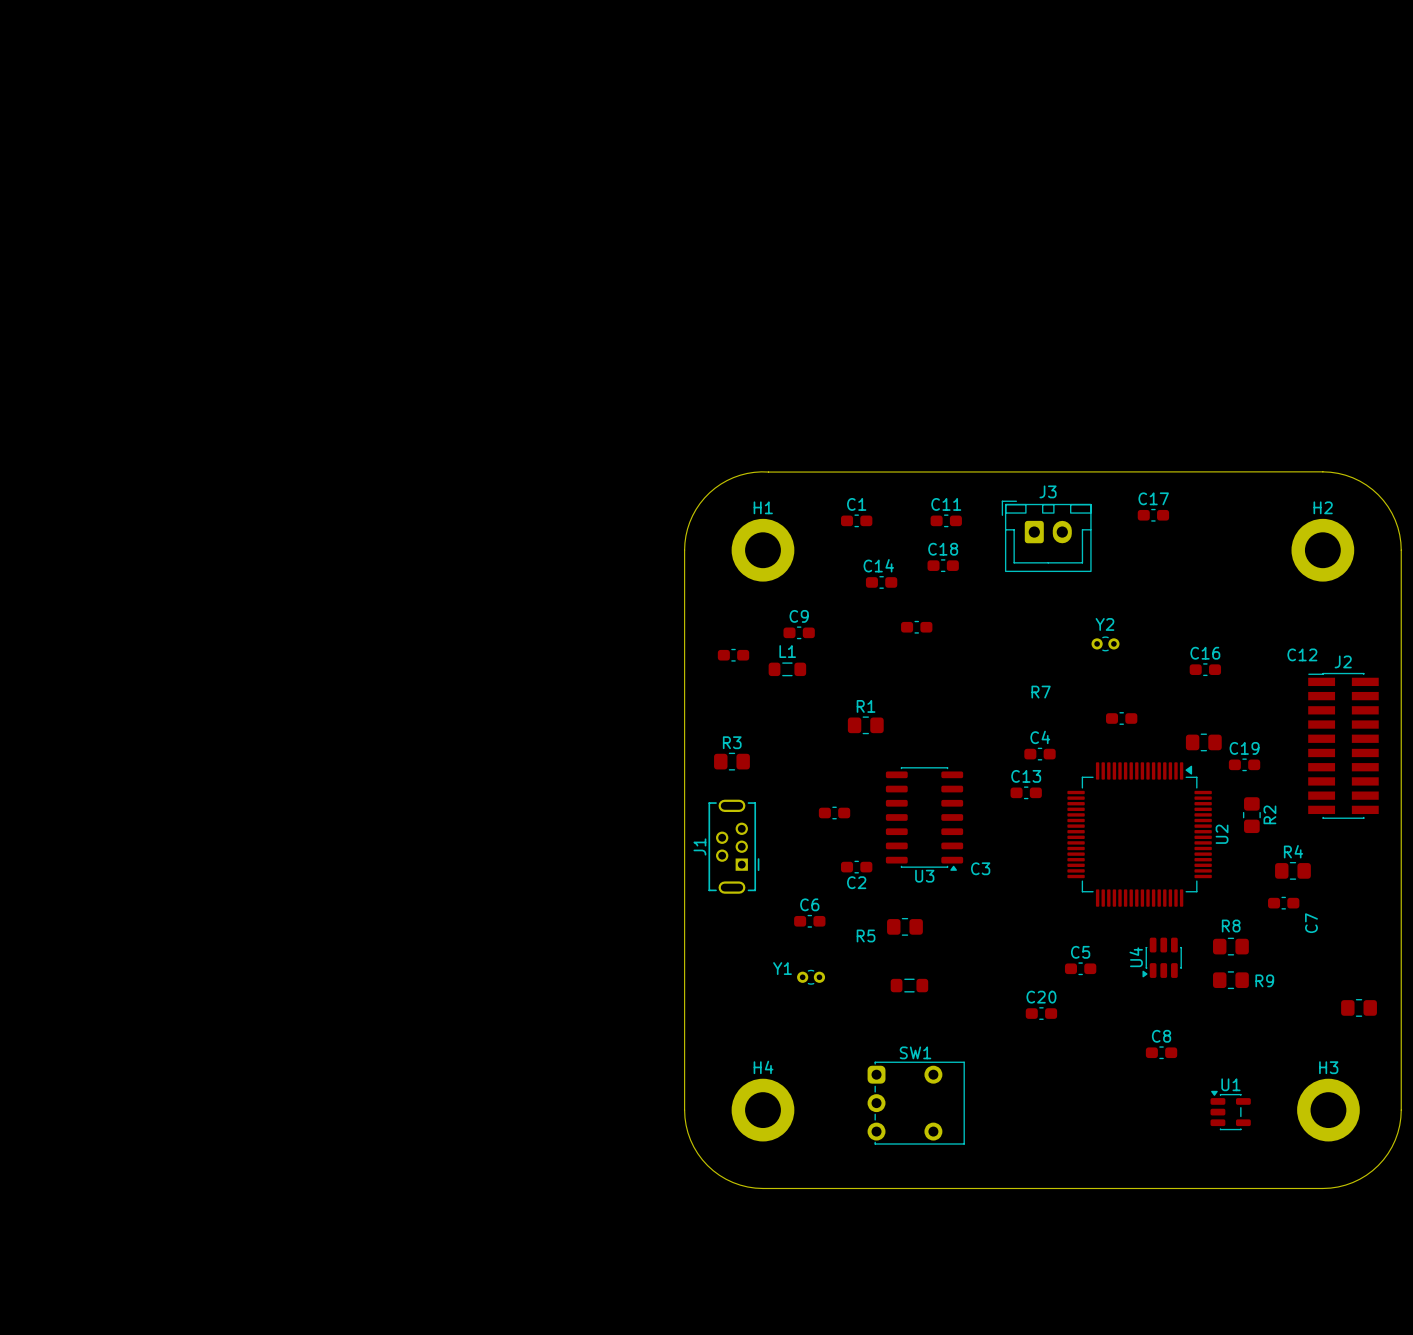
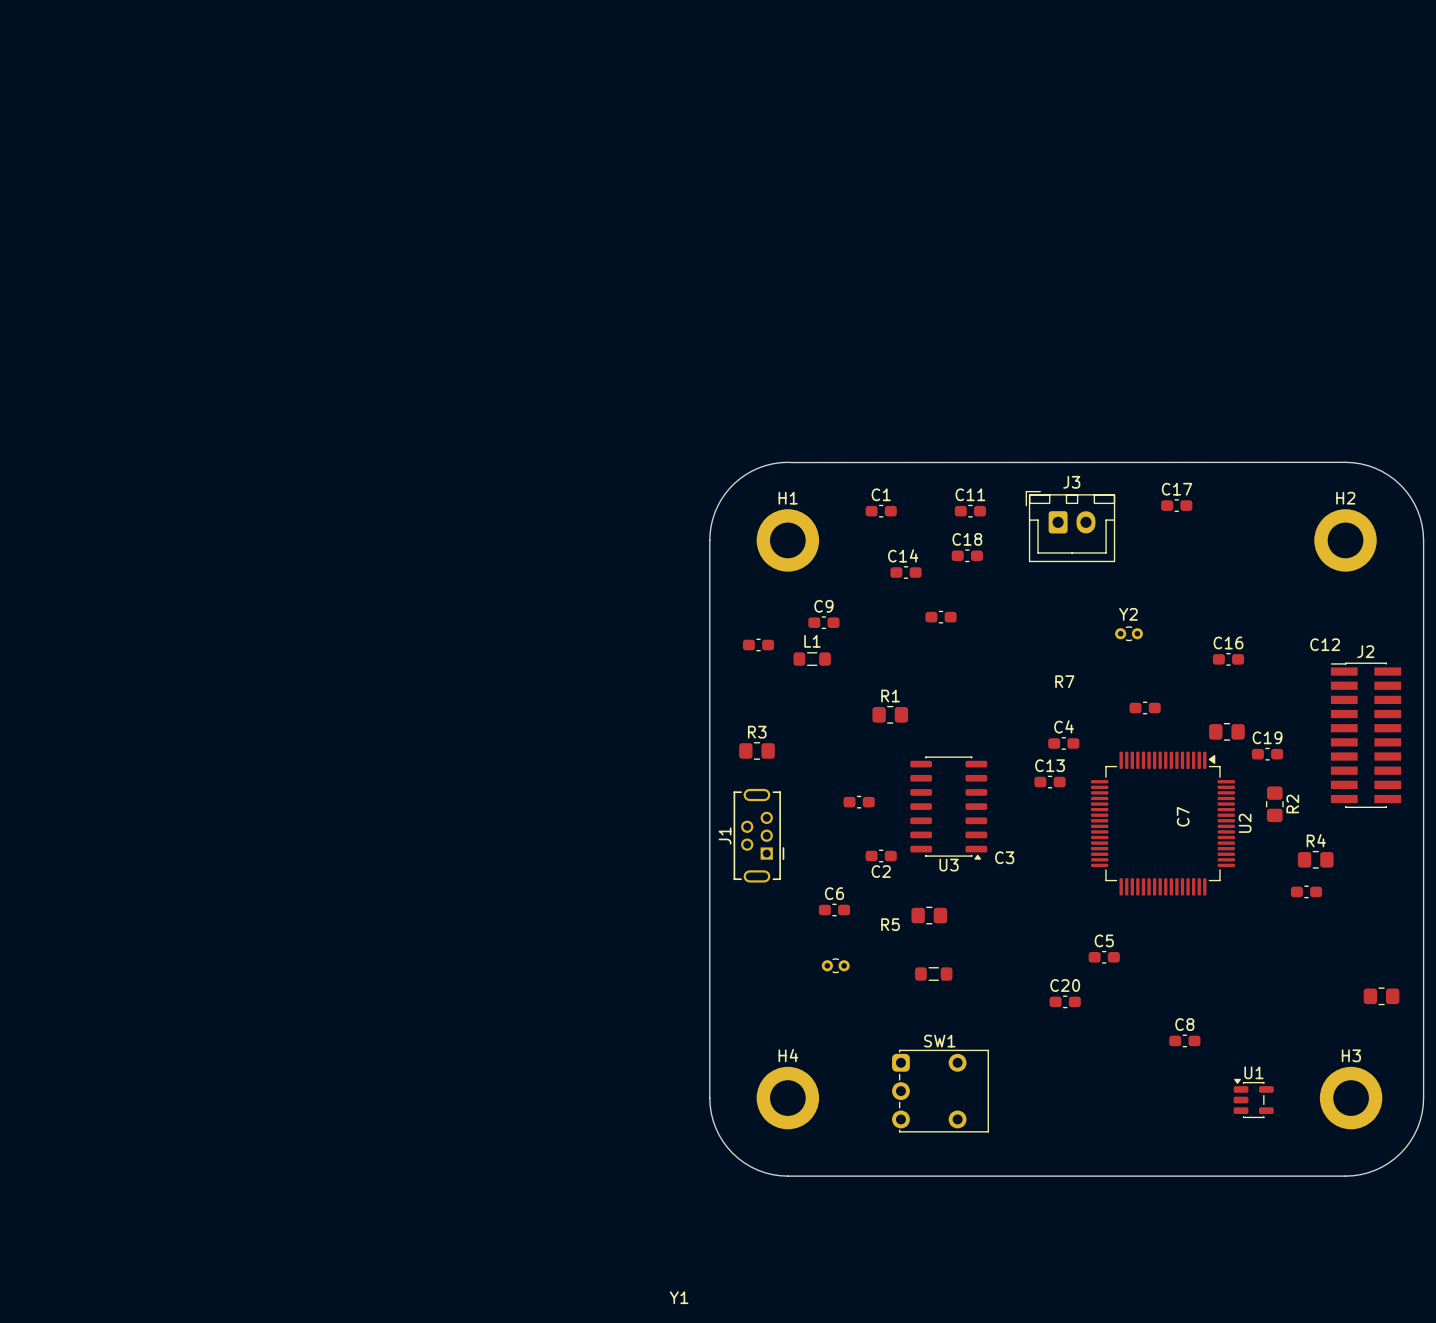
C7 name position: C7 (1311, 923) -> C7 (1183, 816)
R8: (1230, 946) -> none
U4: (1162, 957) -> none
Y1 name position: Y1 (782, 968) -> Y1 (679, 1297)
R9: (1230, 980) -> none

